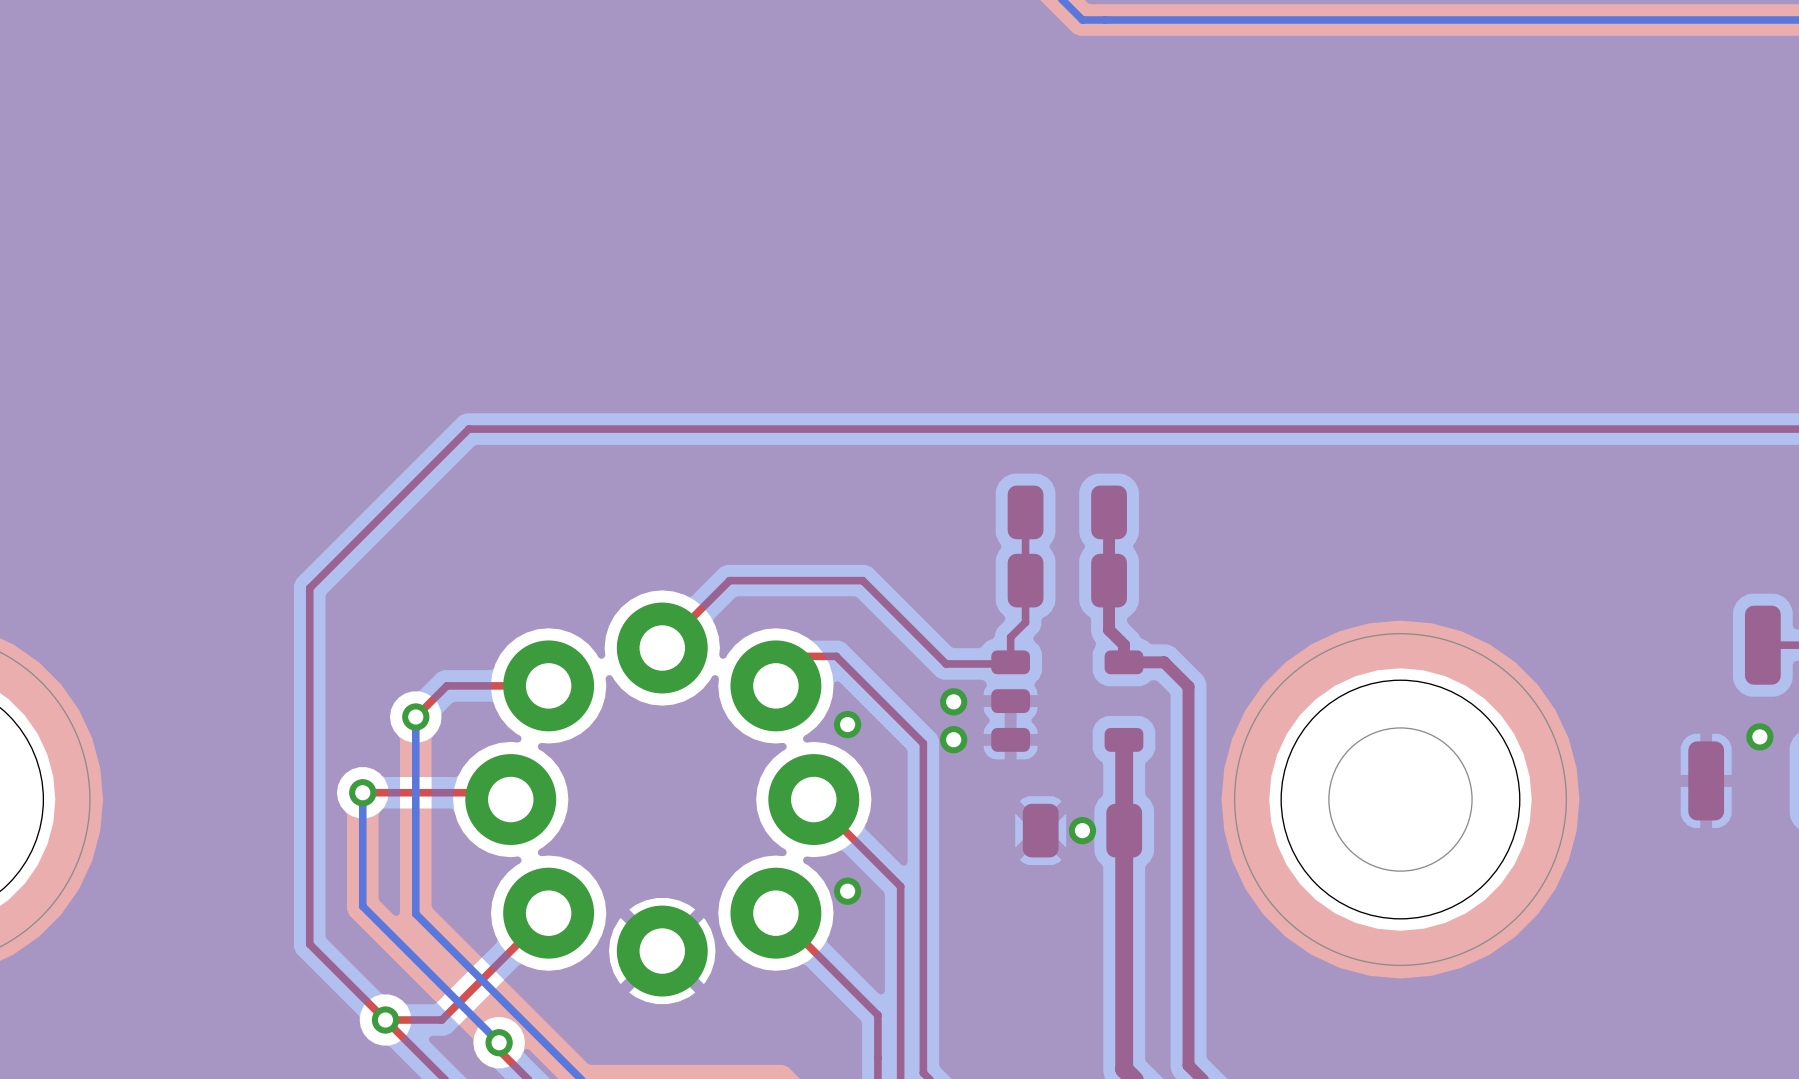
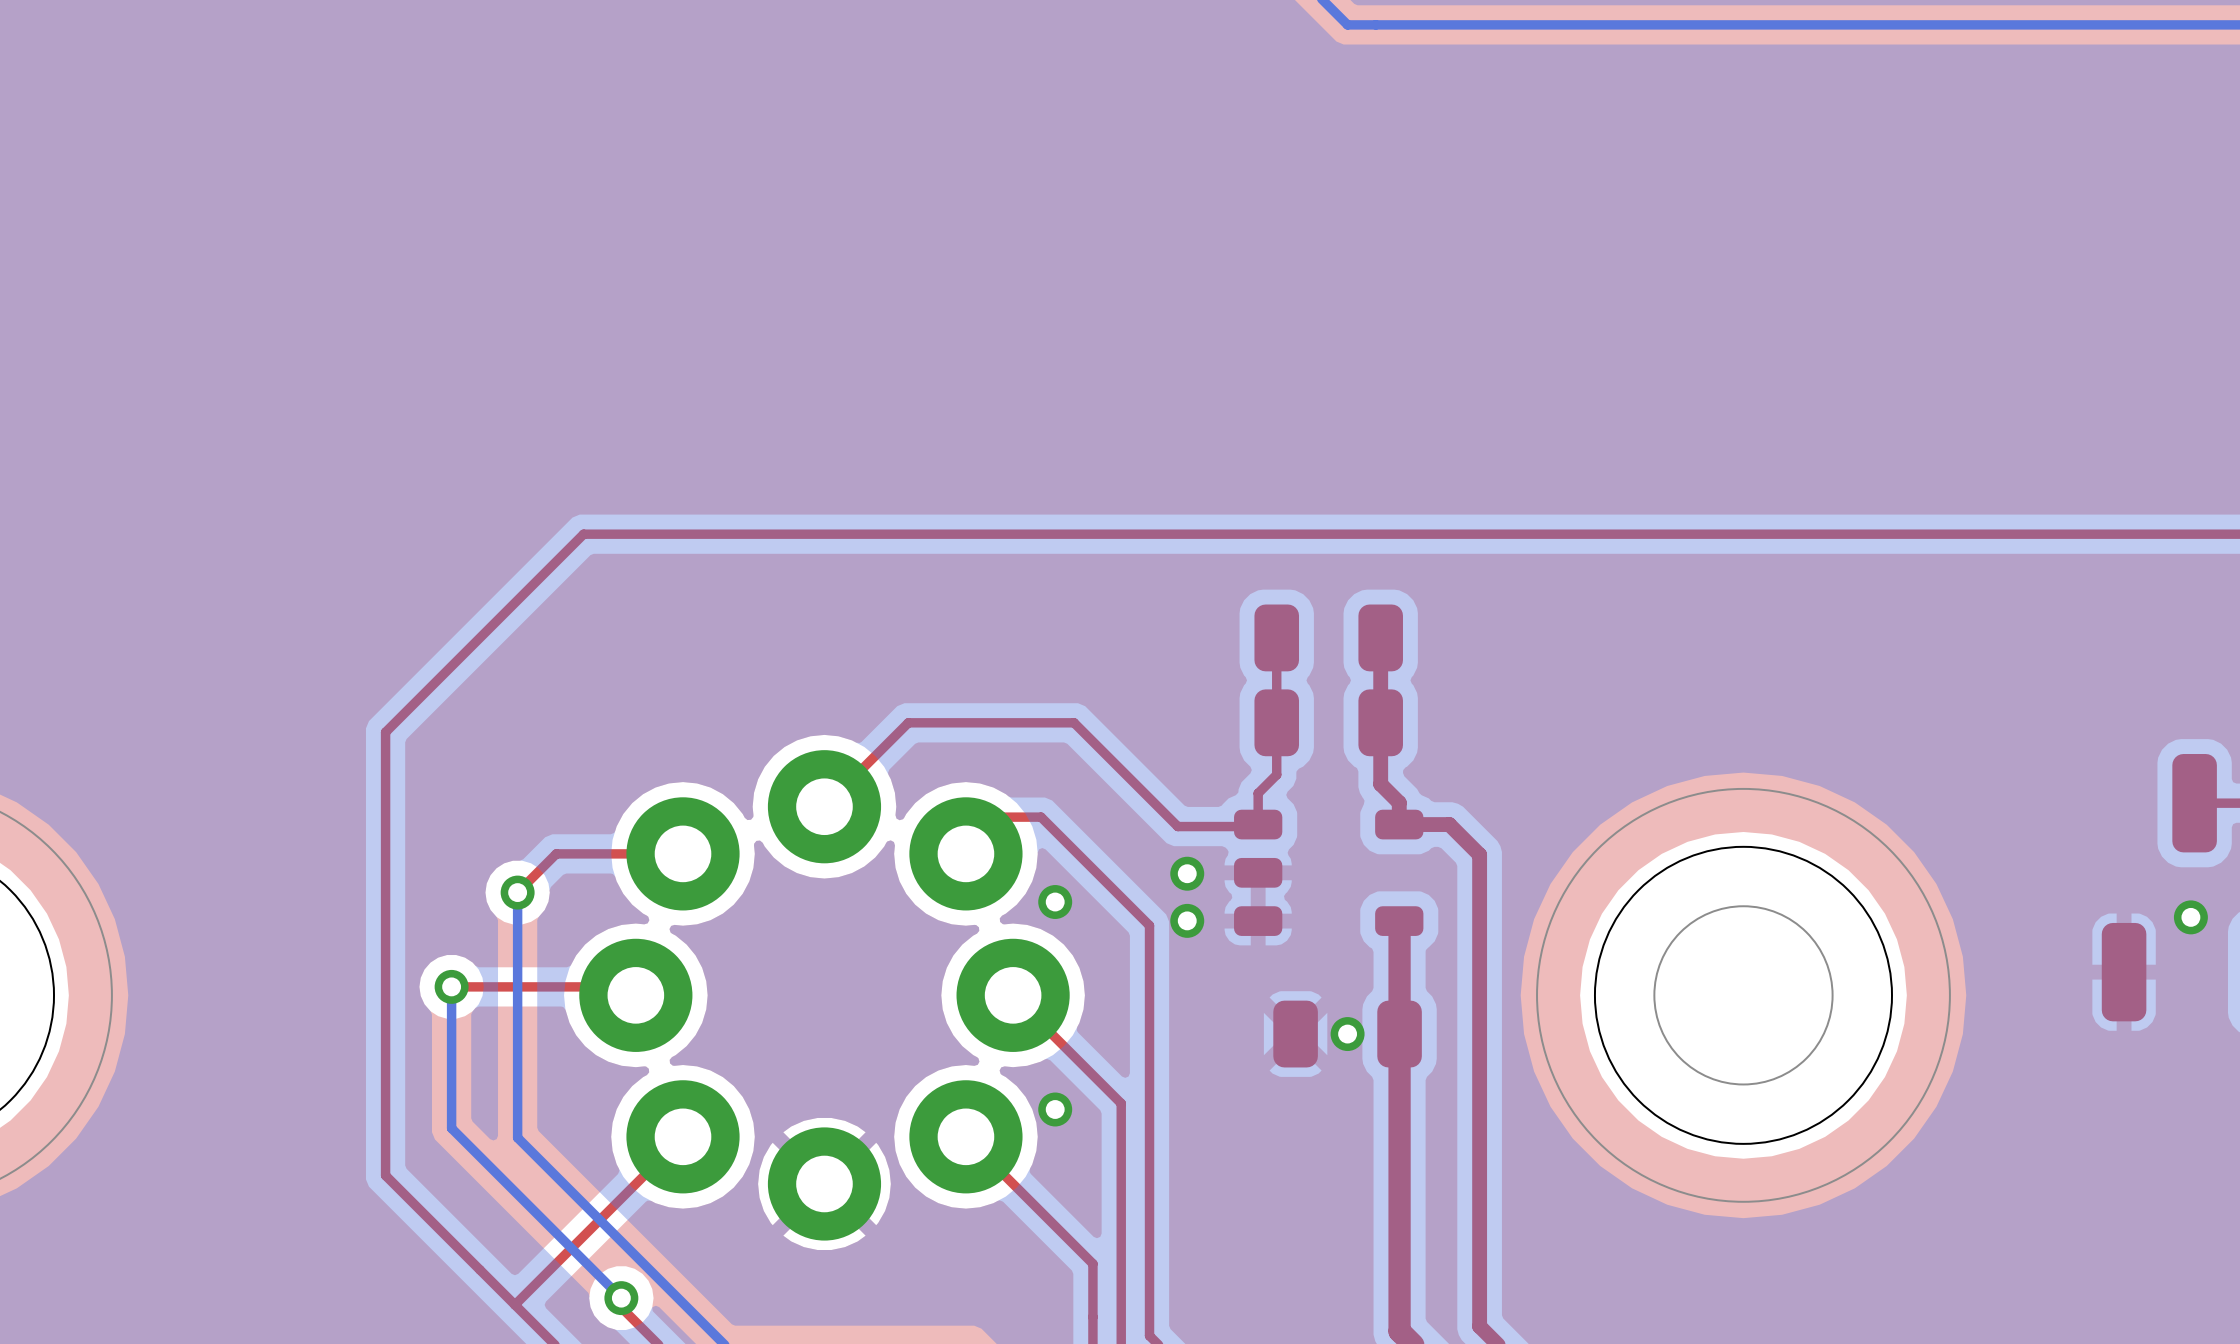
via: (385, 1020) -> none
top track: (441, 1020) (385, 1020) -> (550, 1269) (514, 1304)

